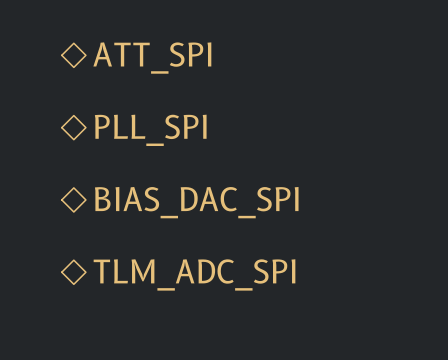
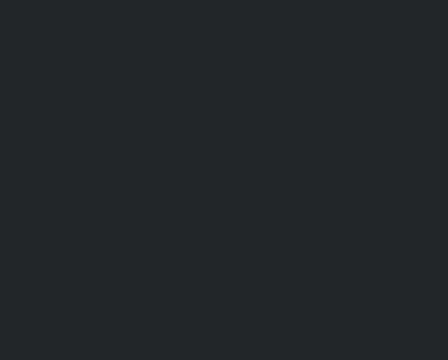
hierarchical label: ATT_SPI (152, 58) -> none
hierarchical label: PLL_SPI (150, 130) -> none
hierarchical label: BIAS_DAC_SPI (196, 202) -> none
hierarchical label: TLM_ADC_SPI (194, 274) -> none

